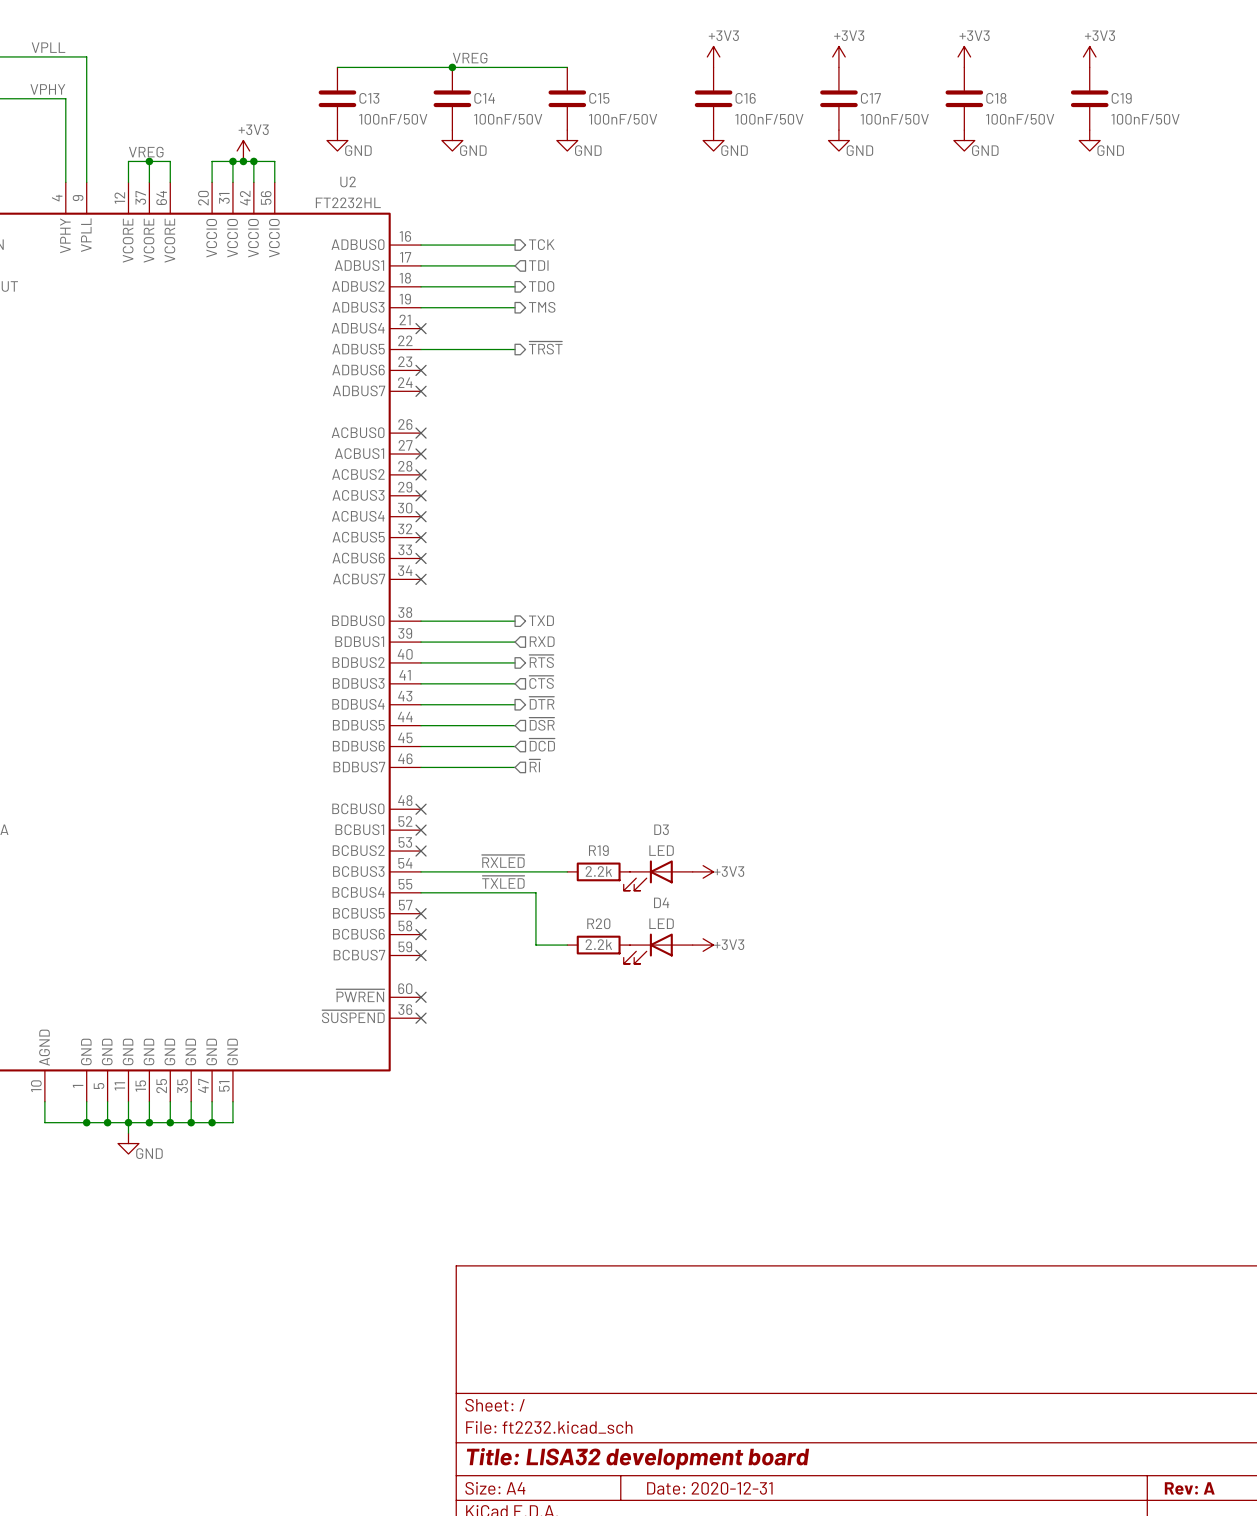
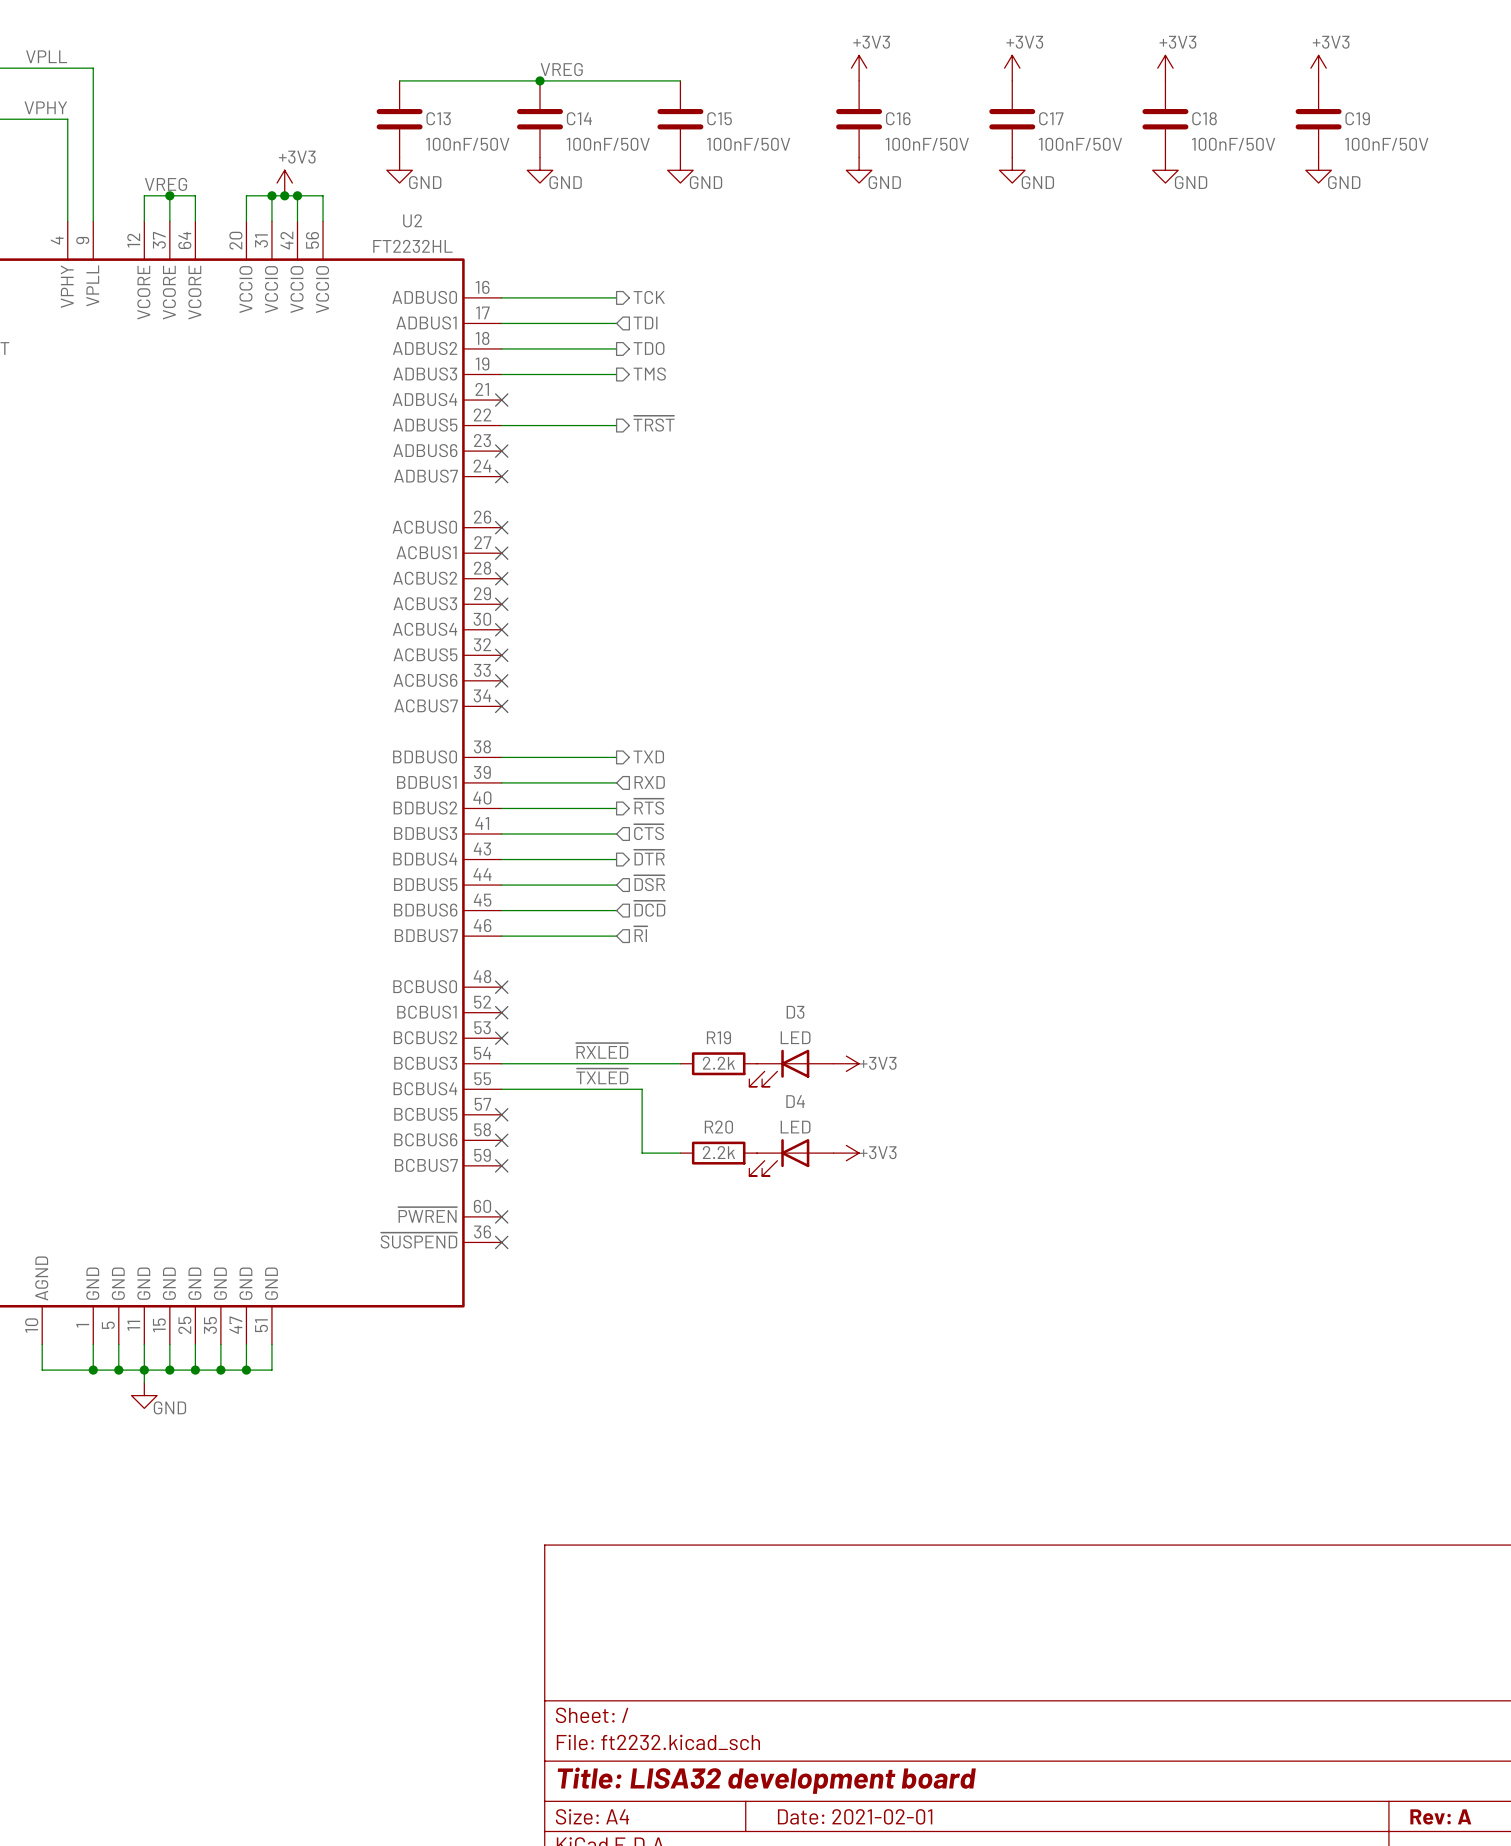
title block: Date: 2020-12-31 (709, 1488) -> Date: 2021-02-01 (855, 1816)

